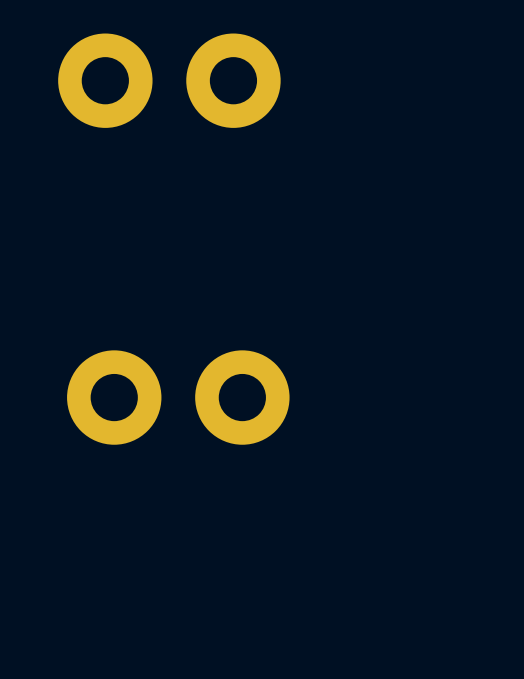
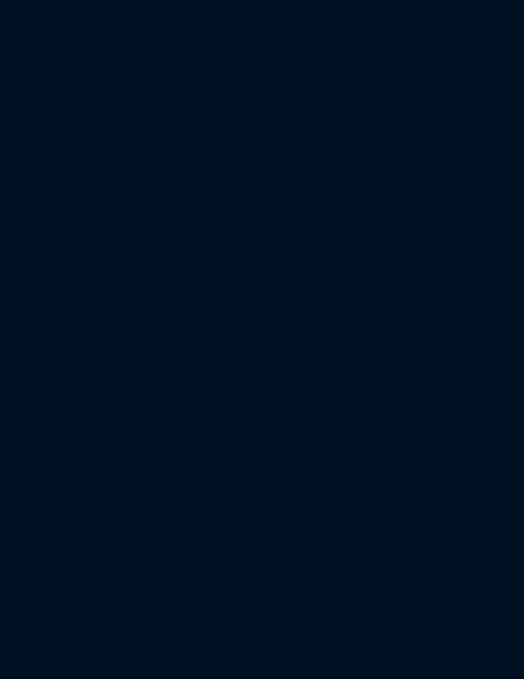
part: (169, 80) -> none
part: (178, 397) -> none

